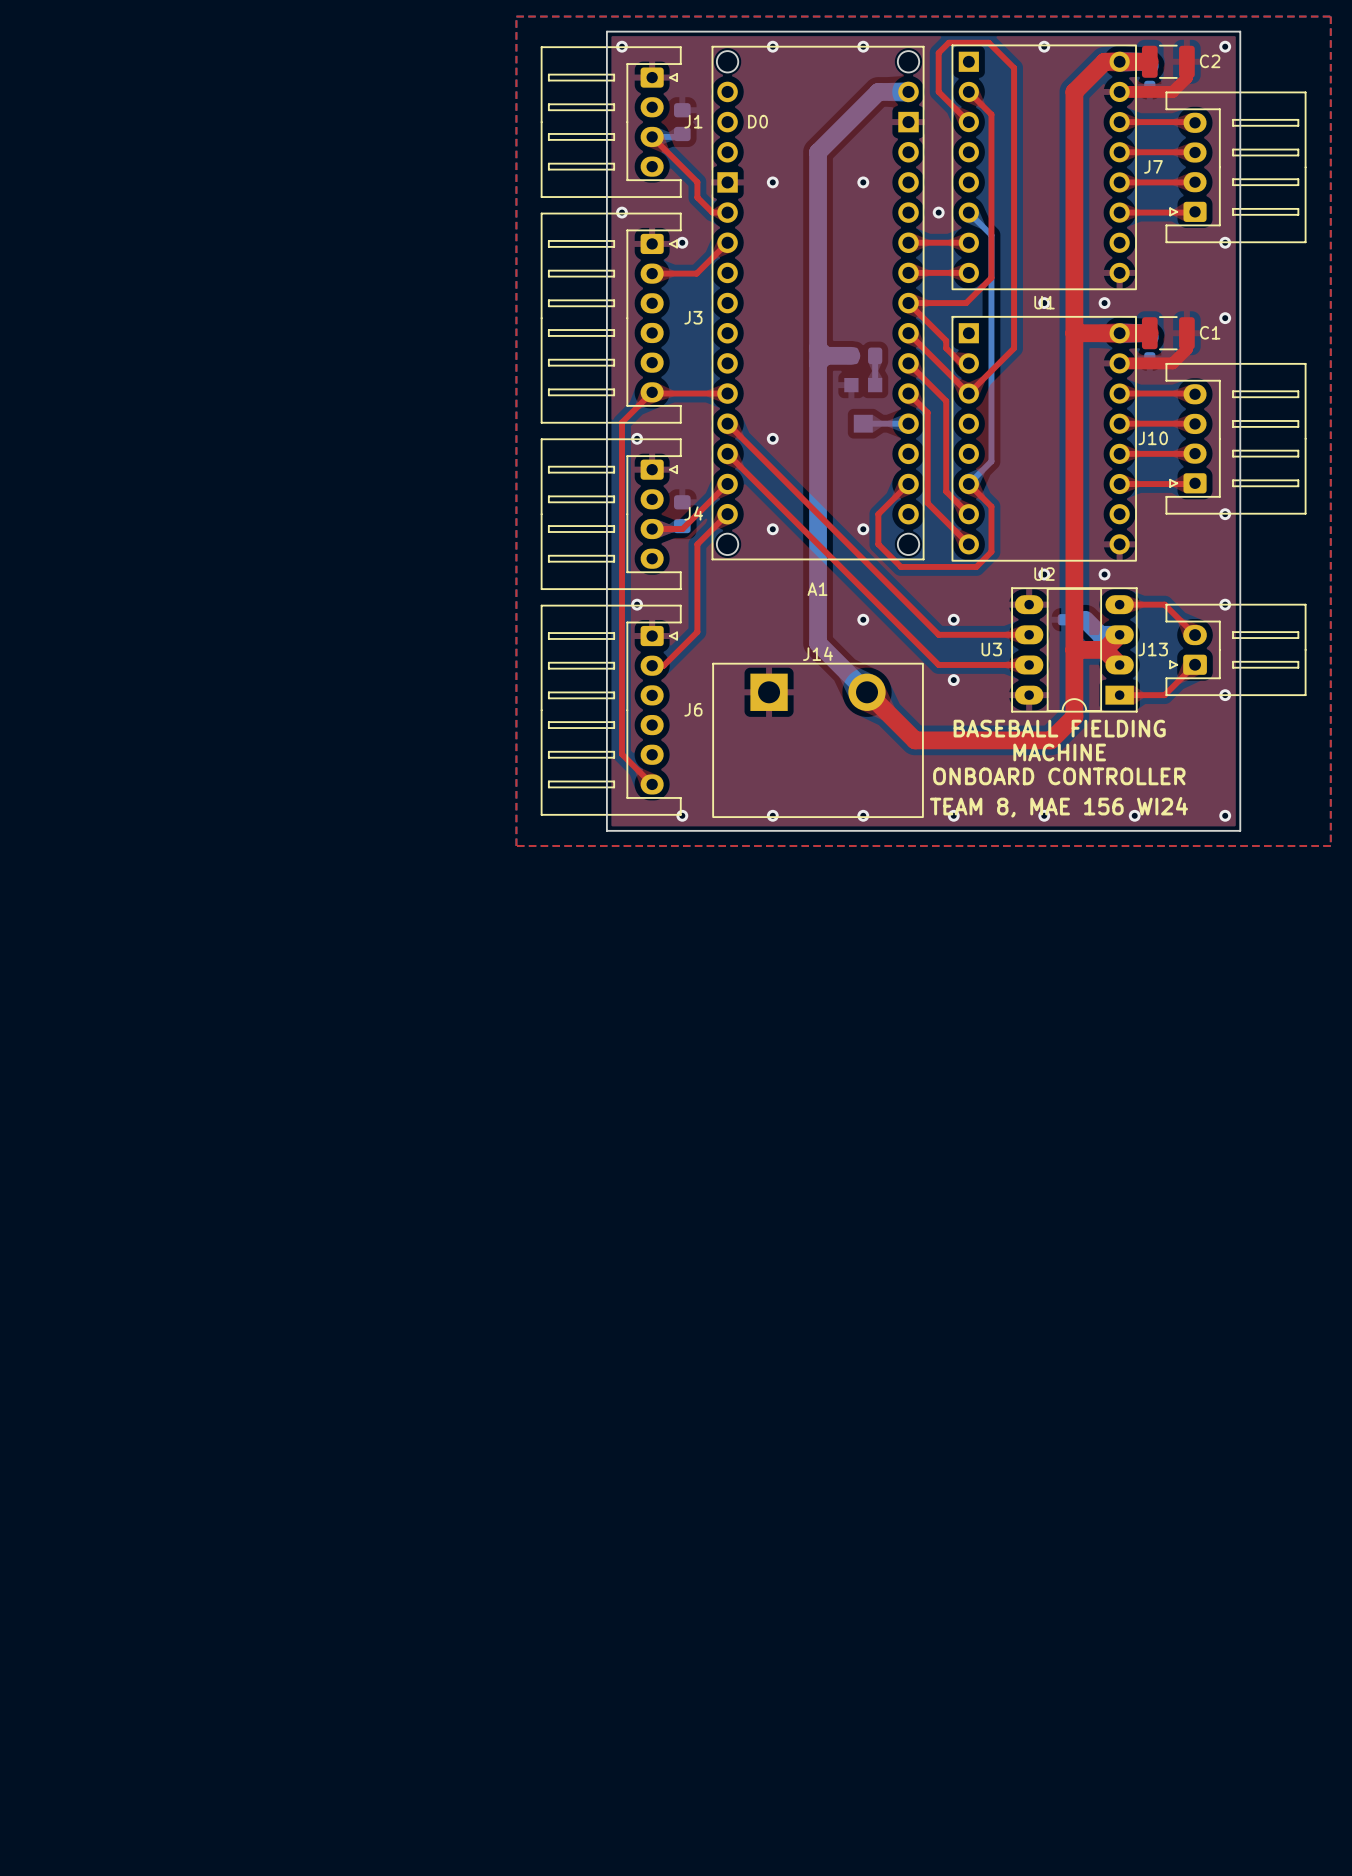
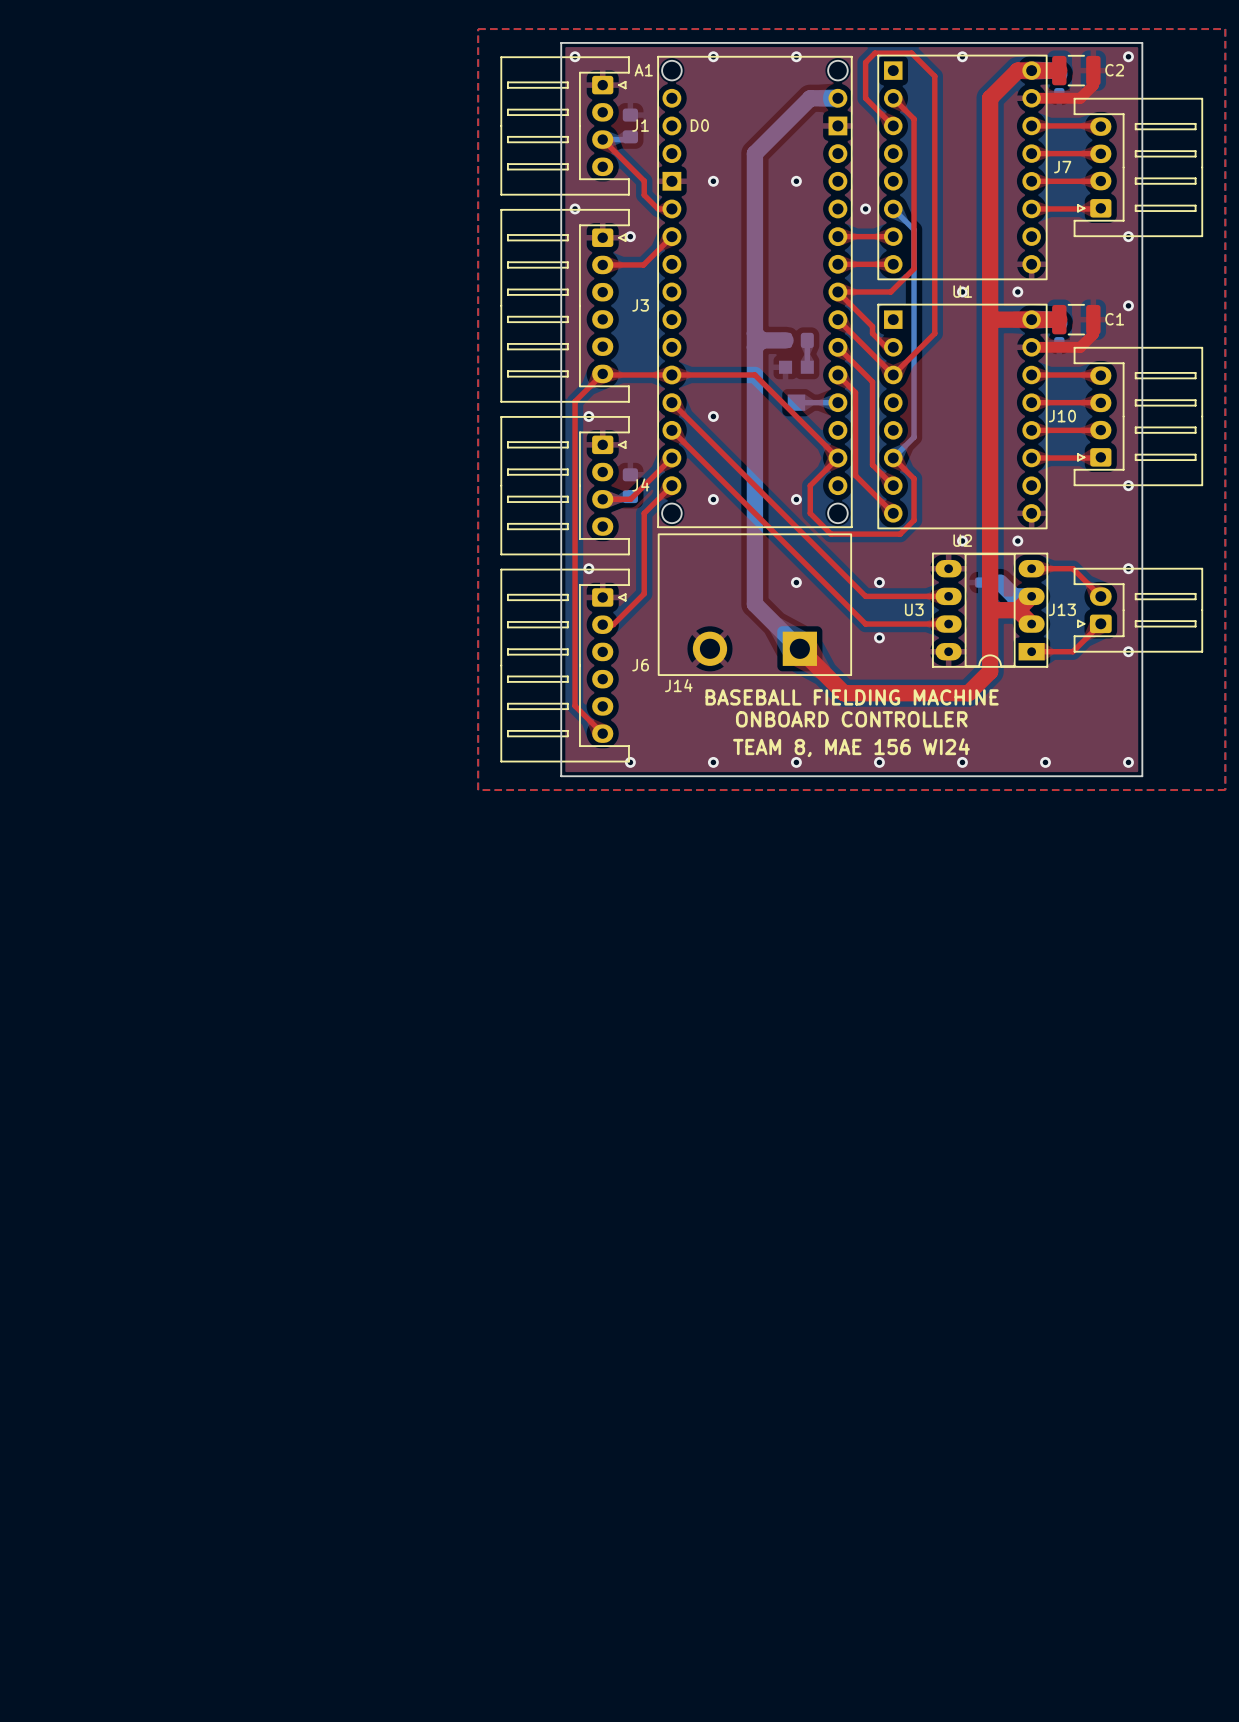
top track: none -> (671, 375) (754, 375) (837, 458)
A1 name position: A1 (817, 589) -> A1 (643, 70)
J14 name position: J14 (818, 653) -> J14 (678, 685)
text: BASEBALL FIELDING (1059, 728) -> BASEBALL FIELDING MACHINE (852, 697)
J14 rotation: 0° (818, 740) -> 180° (754, 604)
text: MACHINE (1059, 752) -> none
text position: ONBOARD CONTROLLER (1059, 776) -> ONBOARD CONTROLLER (851, 719)
text position: TEAM 8, MAE 156 WI24 (1058, 807) -> TEAM 8, MAE 156 WI24 (851, 747)

